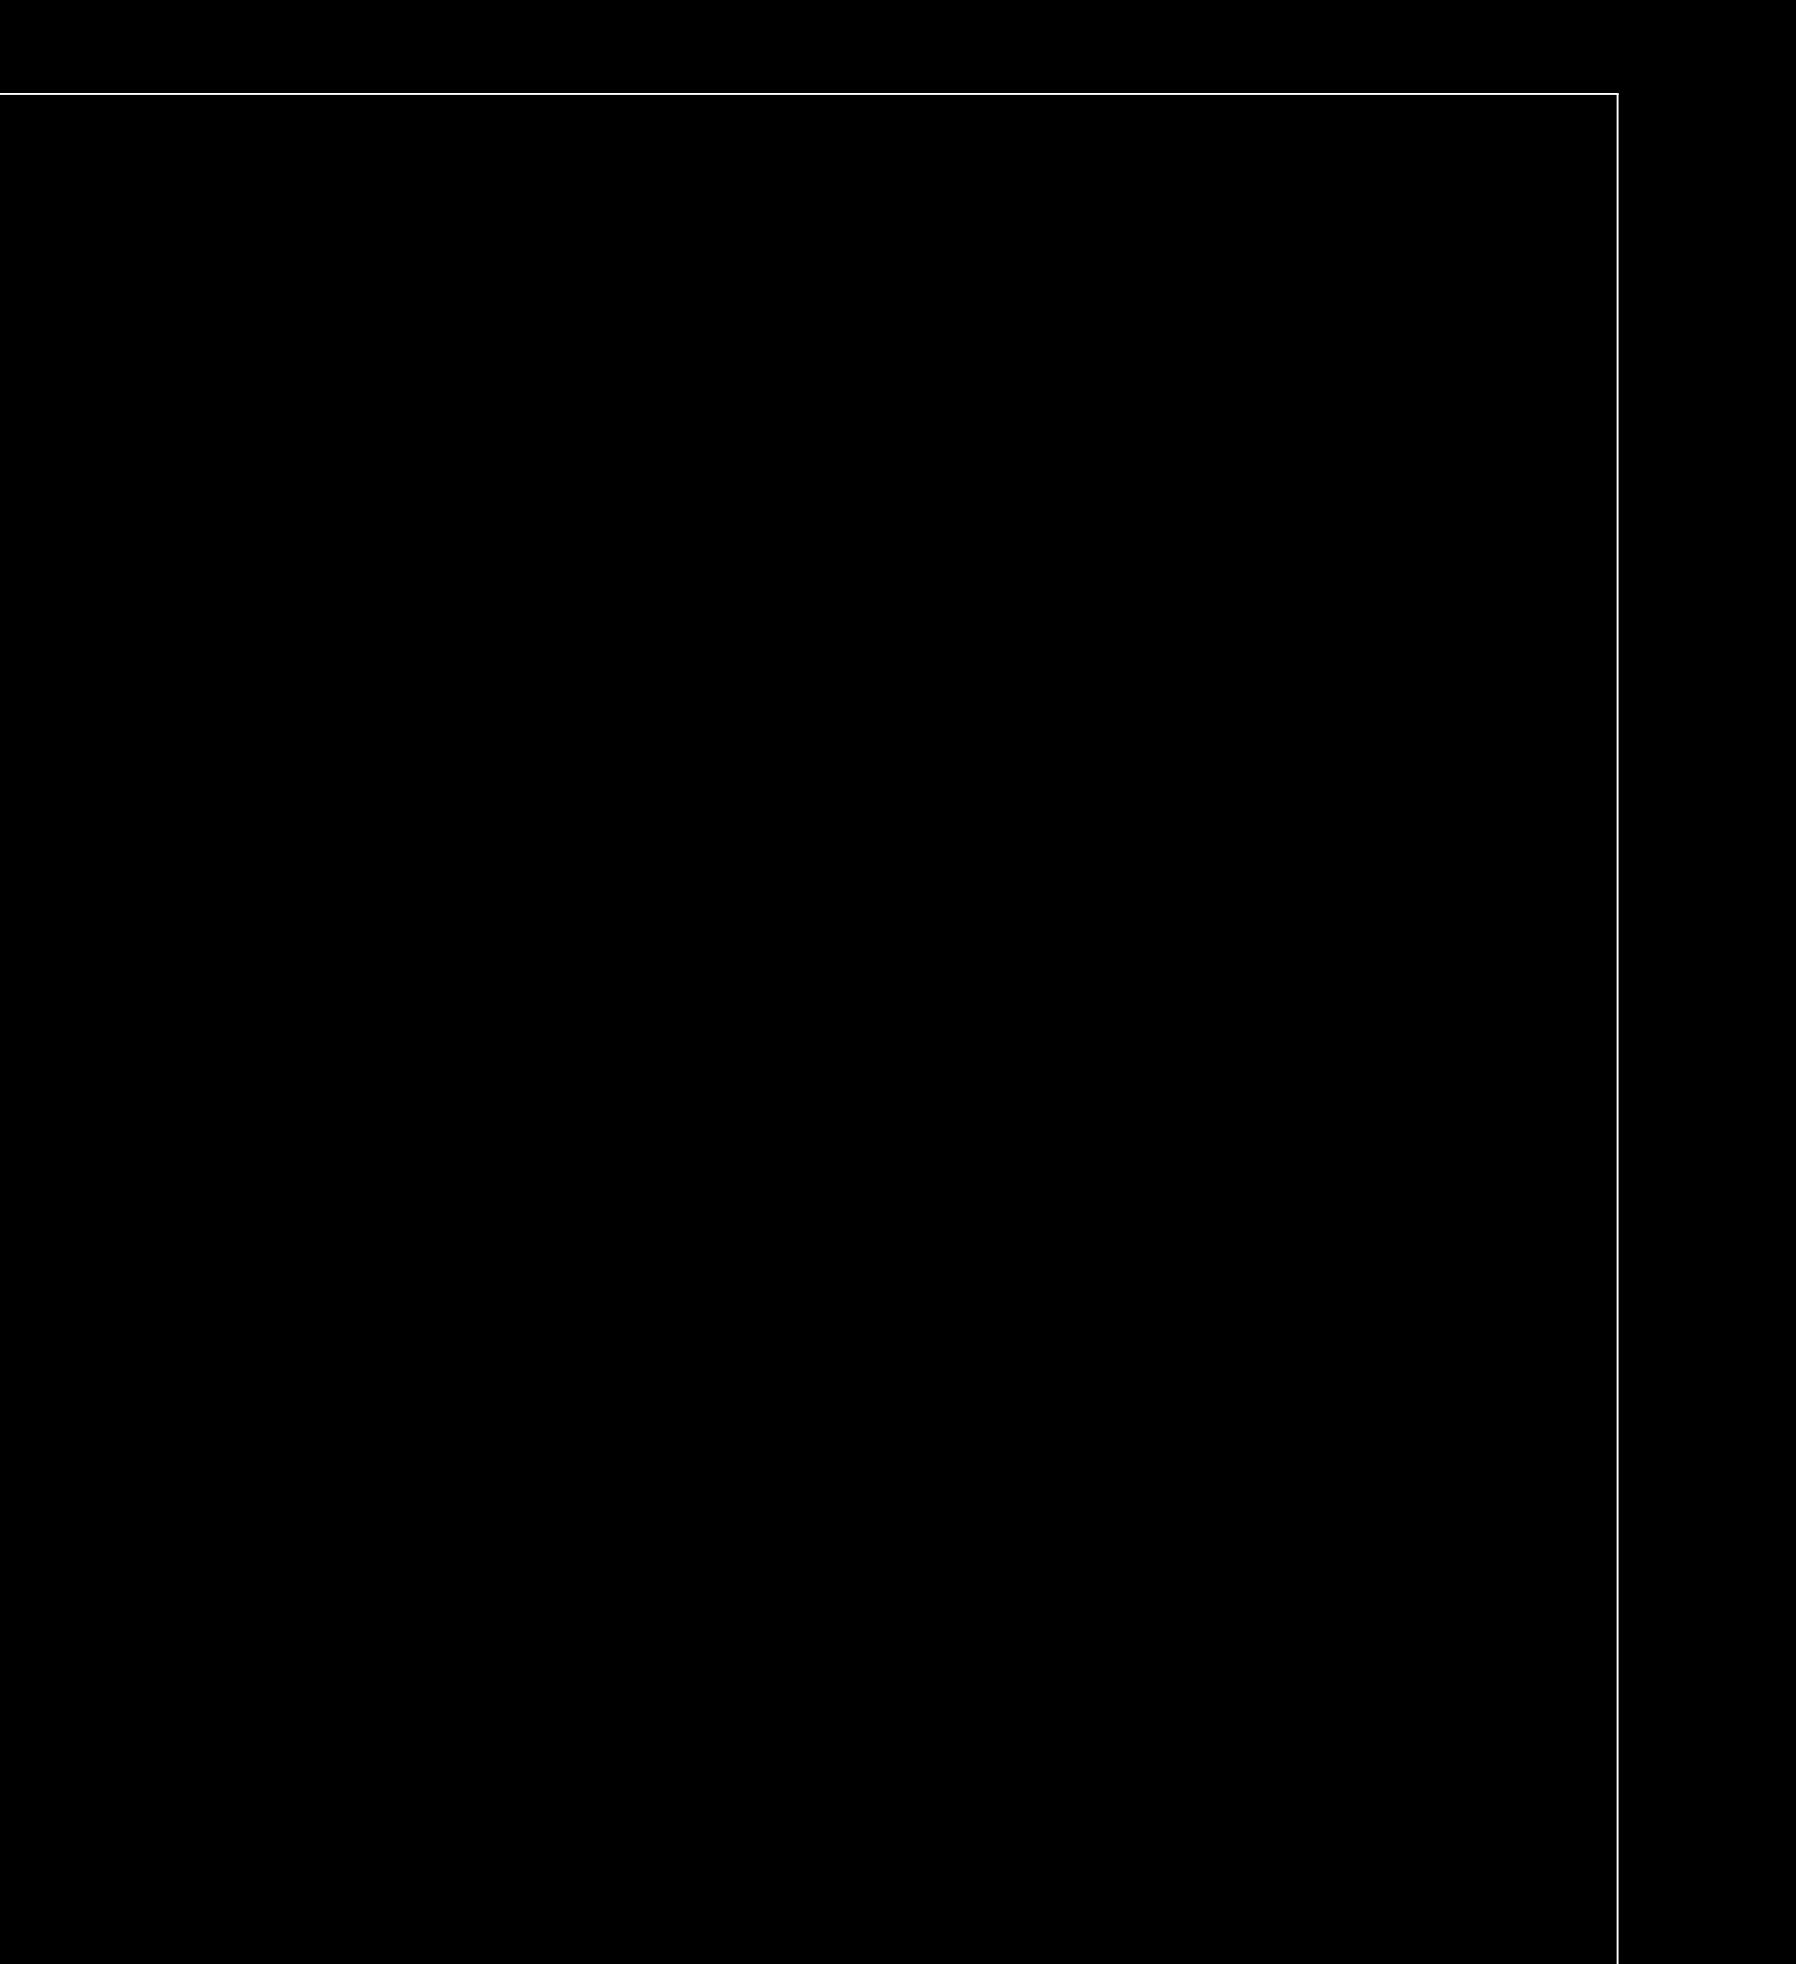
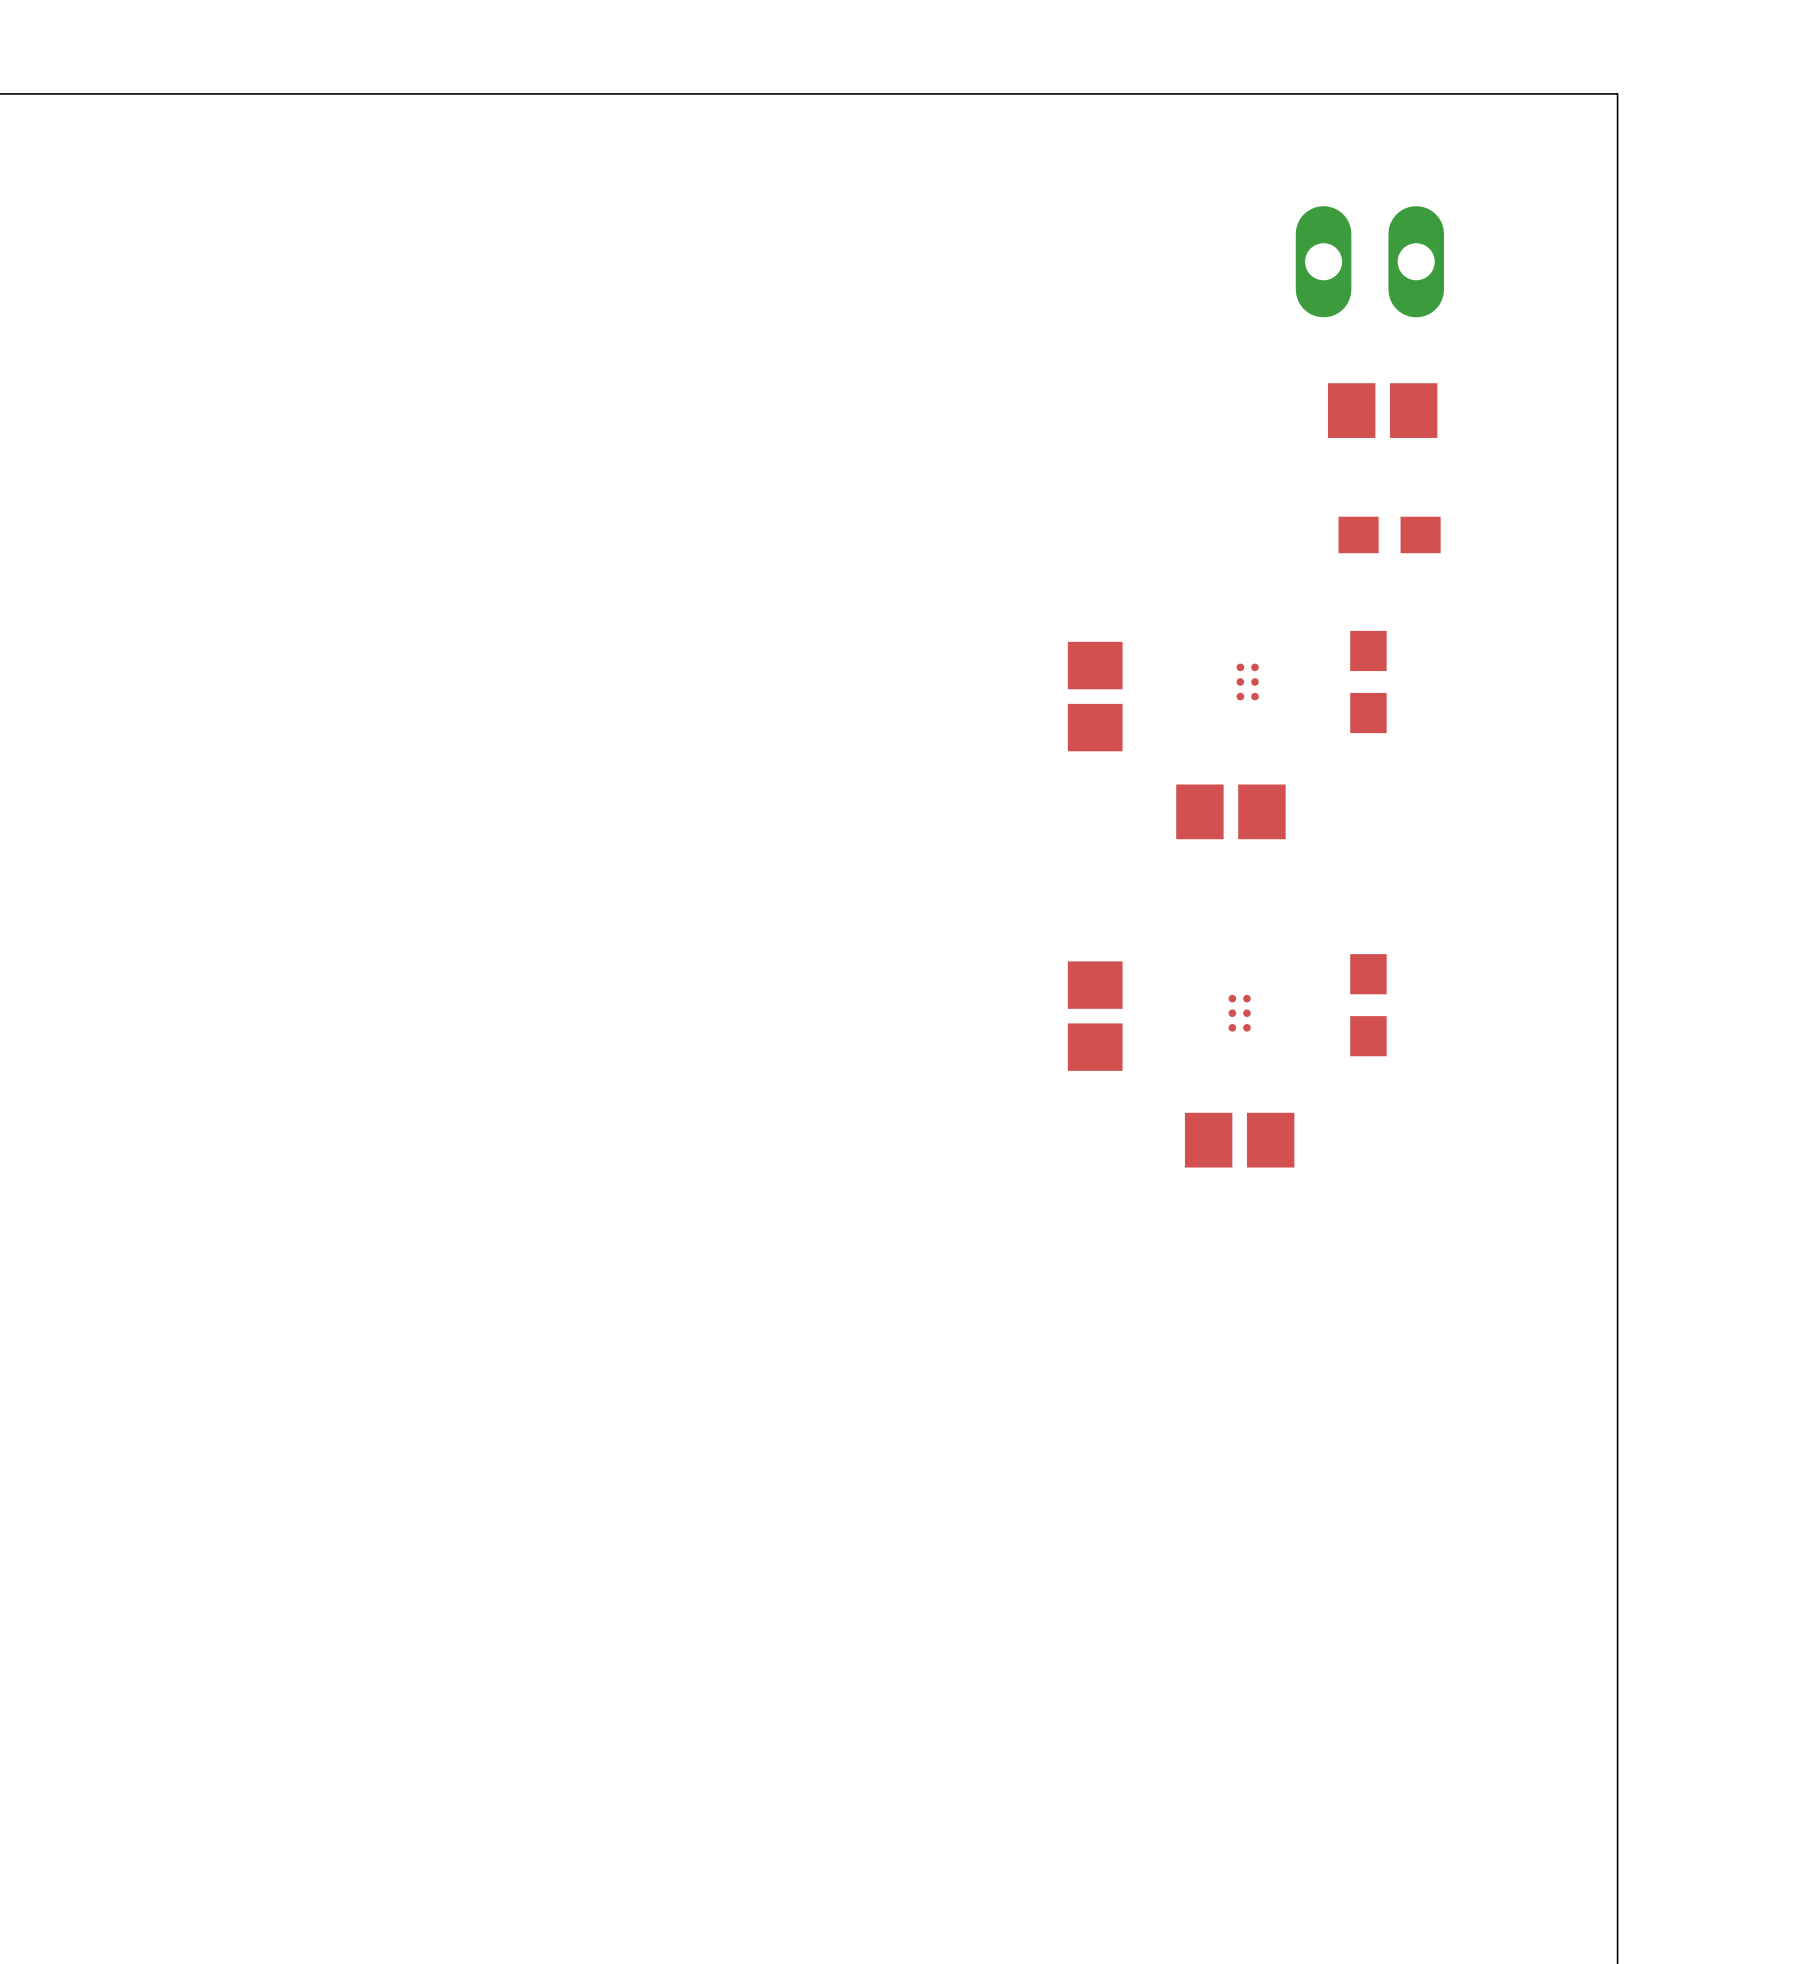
part: none -> (1369, 261)
part: none -> (1382, 410)
part: none -> (1389, 534)
part: none -> (1247, 681)
part: none -> (1368, 681)
part: none -> (1095, 696)
part: none -> (1230, 811)
part: none -> (1368, 1005)
part: none -> (1239, 1013)
part: none -> (1095, 1016)
part: none -> (1239, 1140)

